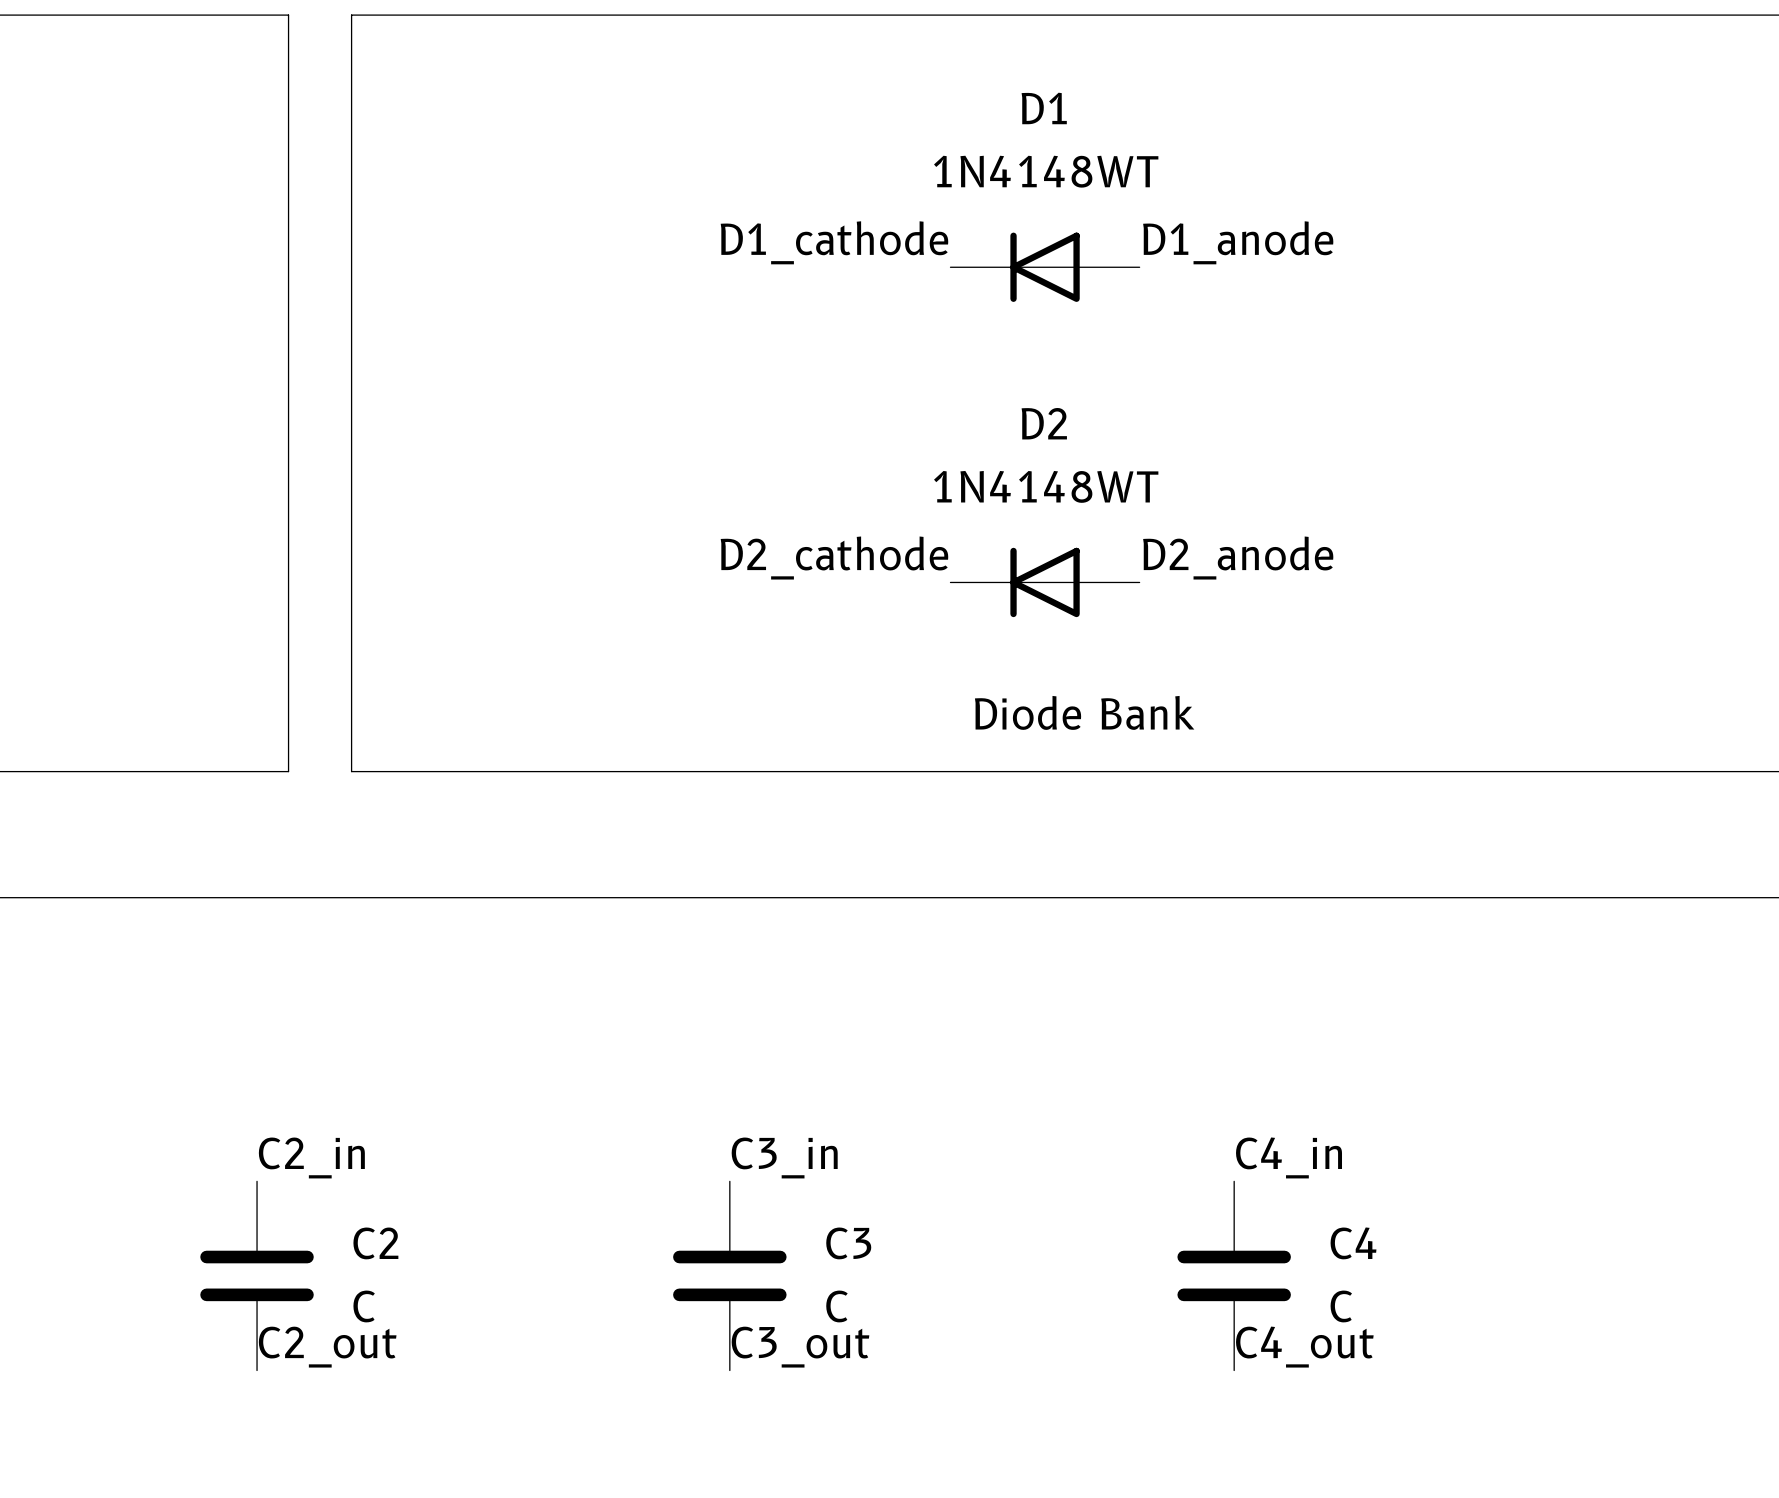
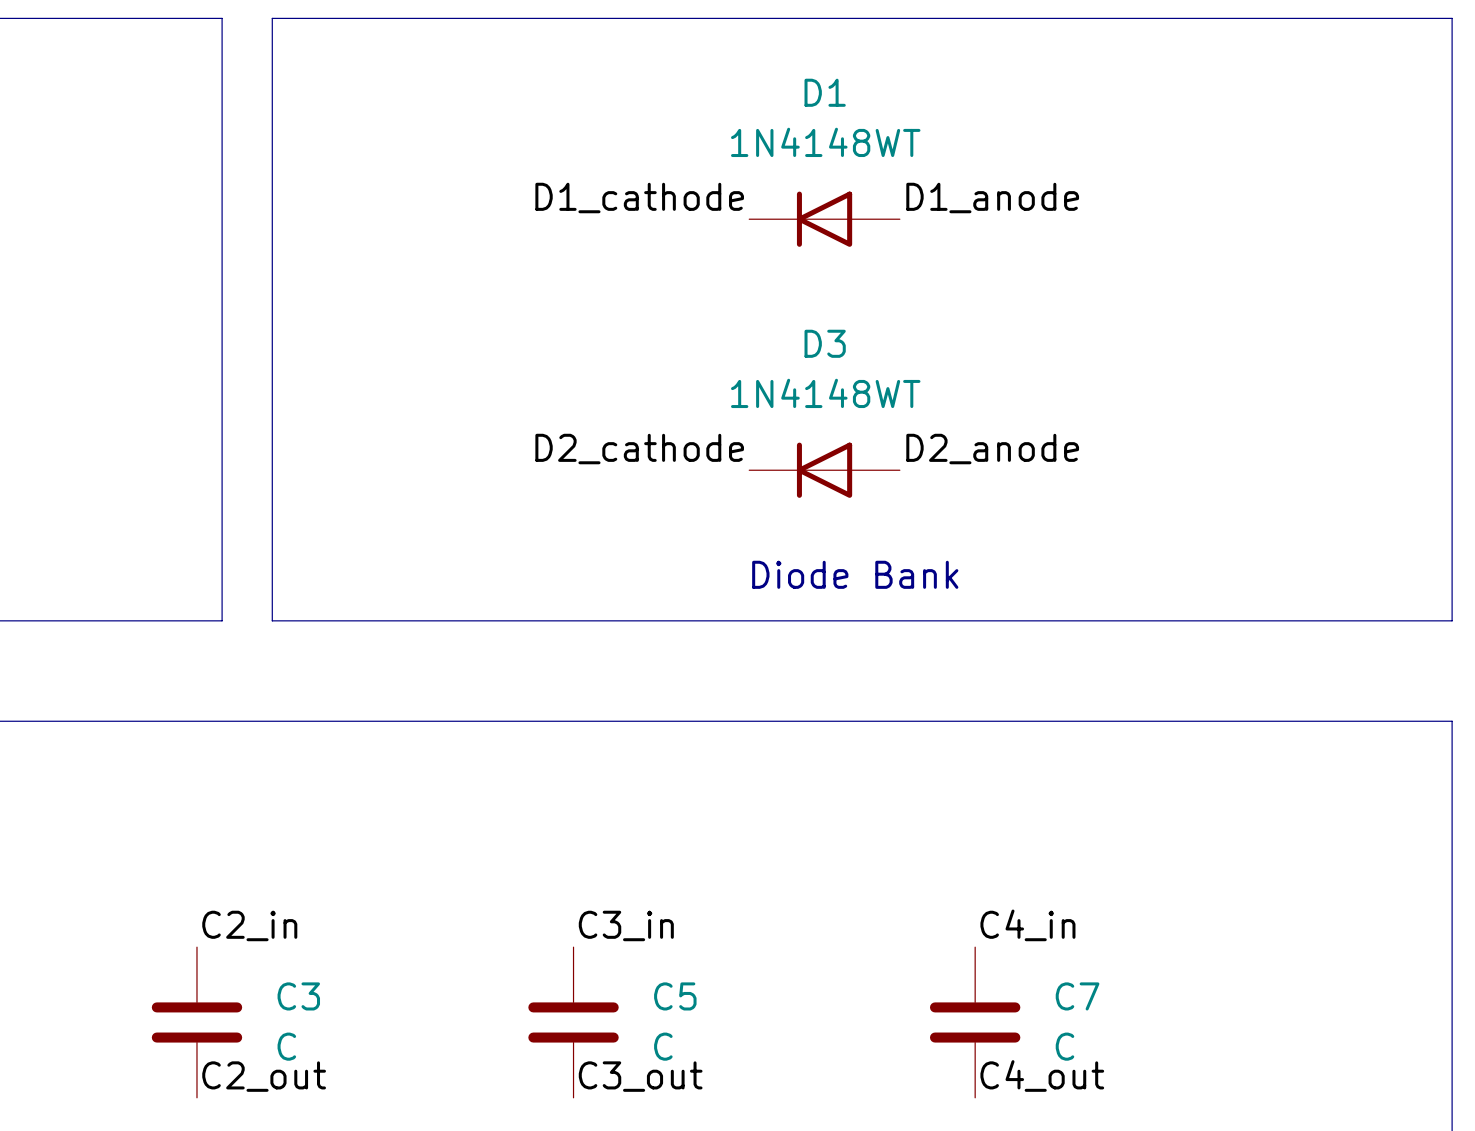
D2 name: D2 (1044, 423) -> D3 (825, 343)
C2 name: C2 (375, 1243) -> C3 (298, 996)
C3 name: C3 (848, 1243) -> C5 (675, 996)
C4 name: C4 (1353, 1243) -> C7 (1077, 996)

